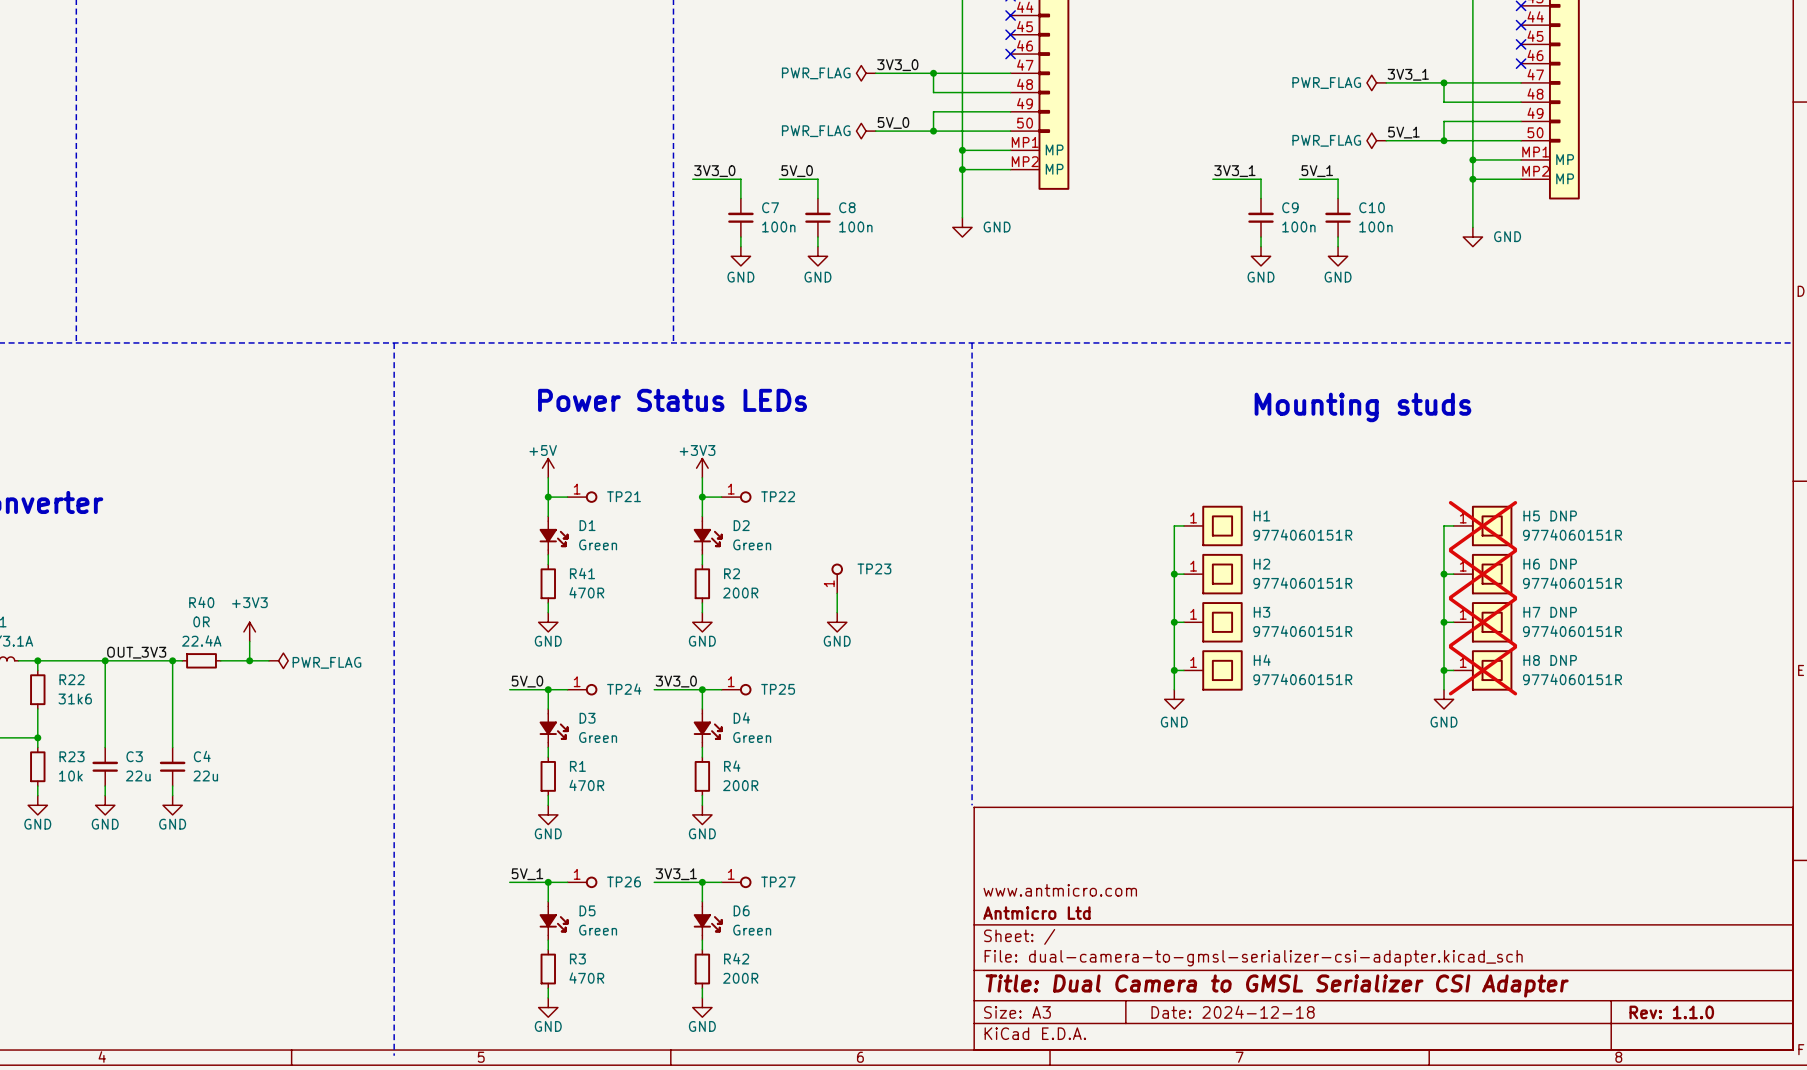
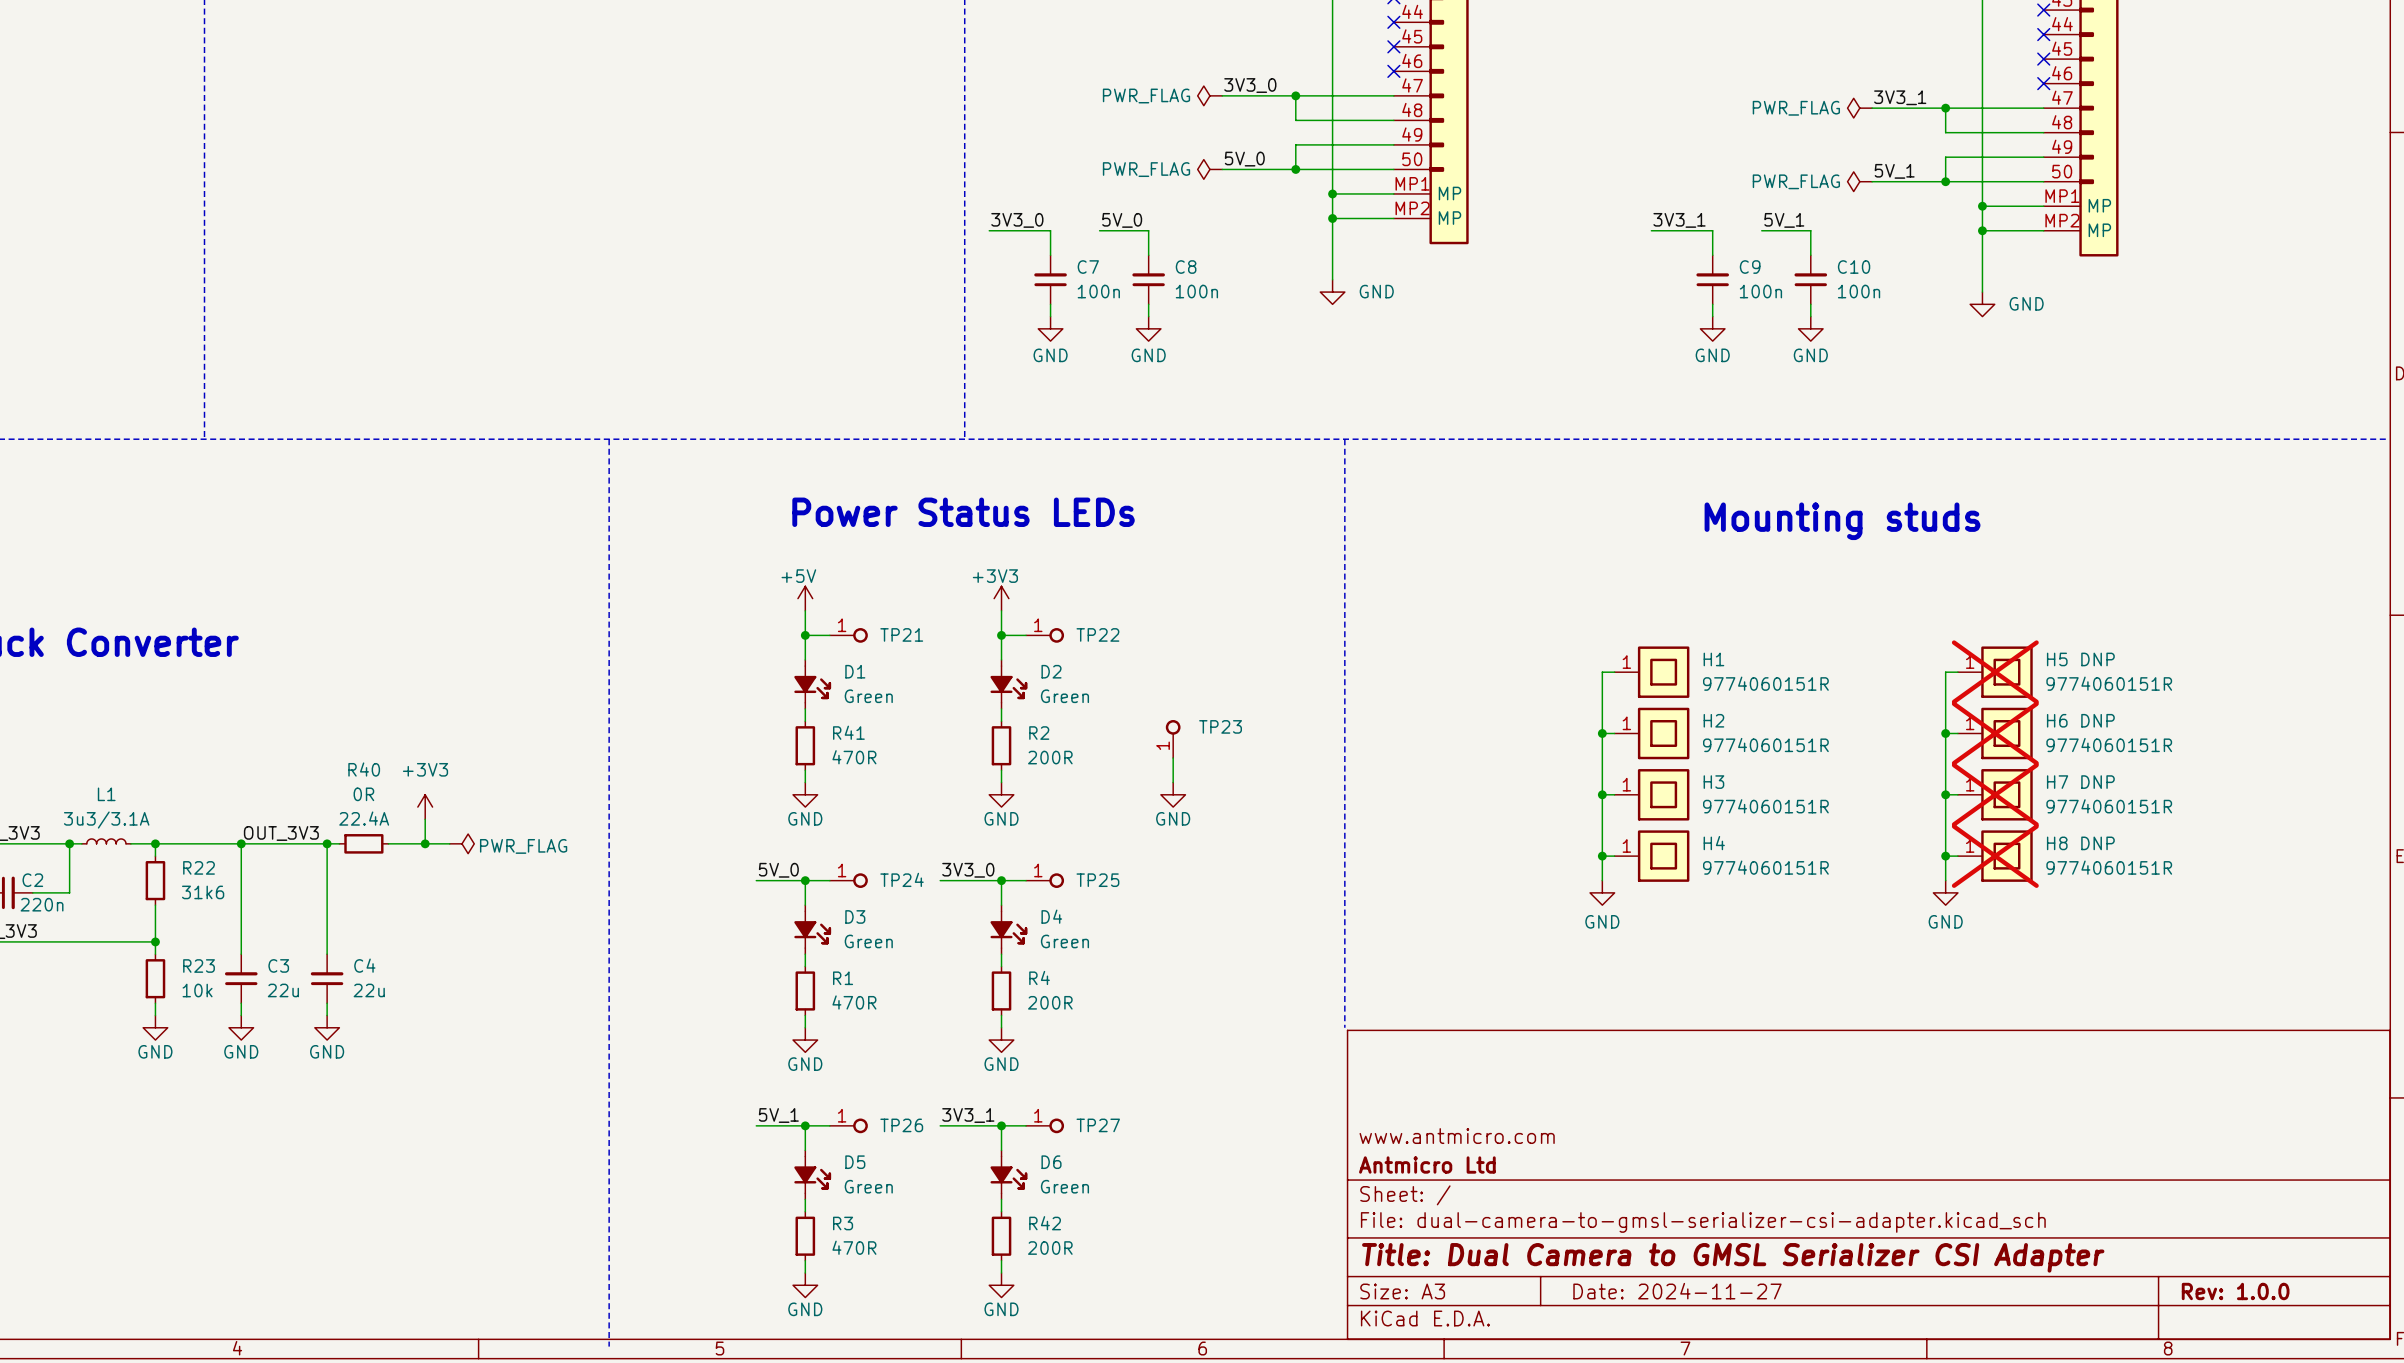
title block: Date: 2024-12-18 (1233, 1012) -> Date: 2024-11-27 (1677, 1291)
title block: Rev: 1.1.0 (1671, 1012) -> Rev: 1.0.0 (2235, 1291)

